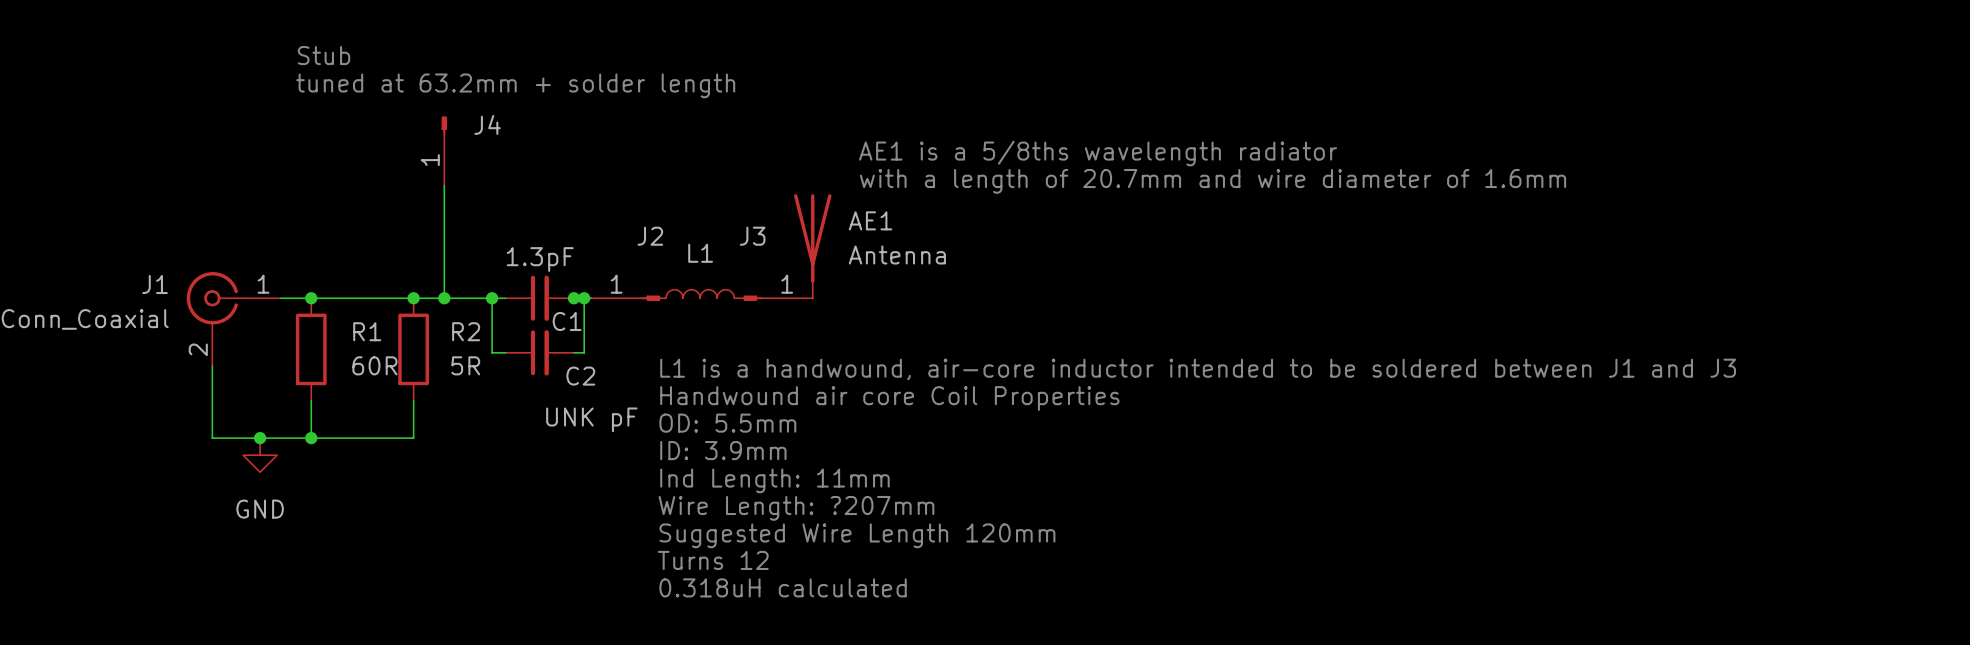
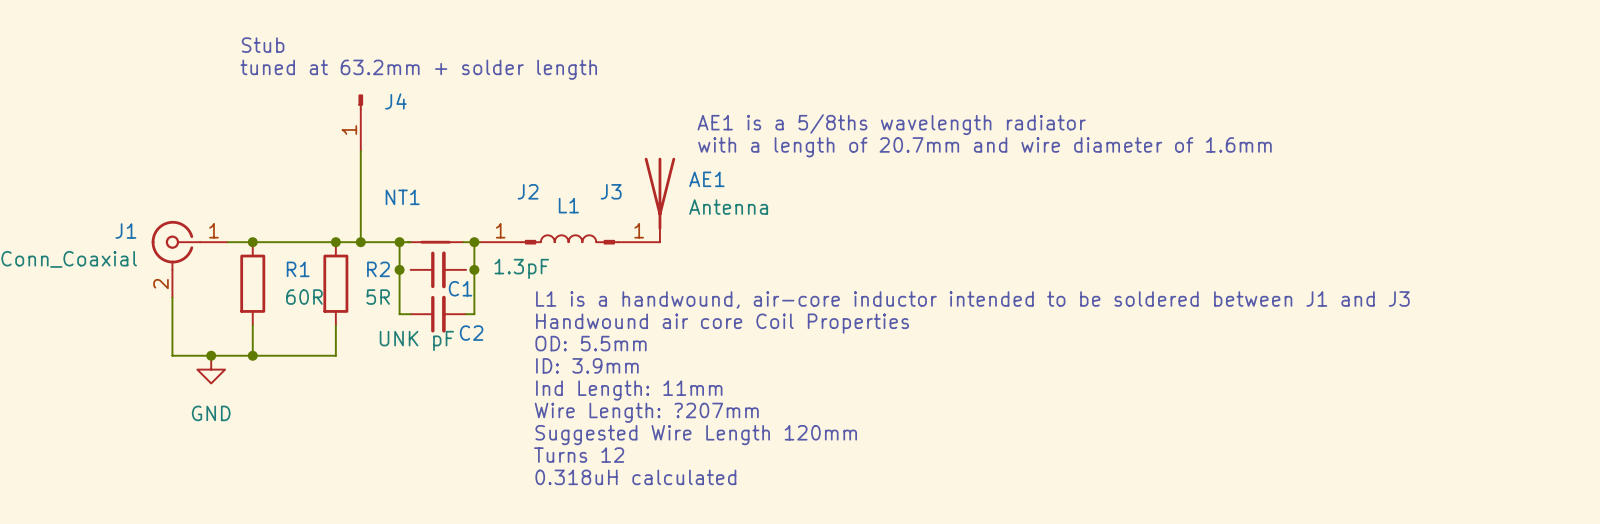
C1 value position: 1.3pF (540, 259) -> 1.3pF (521, 268)
NT1: none -> (435, 242)
C1 position: (539, 298) -> (438, 269)
junction position: (573, 298) -> (474, 269)
junction: none -> (399, 269)
wire: (492, 352) (505, 352) -> (399, 286) (399, 314) (410, 314)
C2 position: (539, 352) -> (438, 314)
wire: (573, 352) (584, 352) -> (466, 314) (474, 314) (474, 286)
C2 value position: UNK pF (591, 419) -> UNK pF (416, 340)

